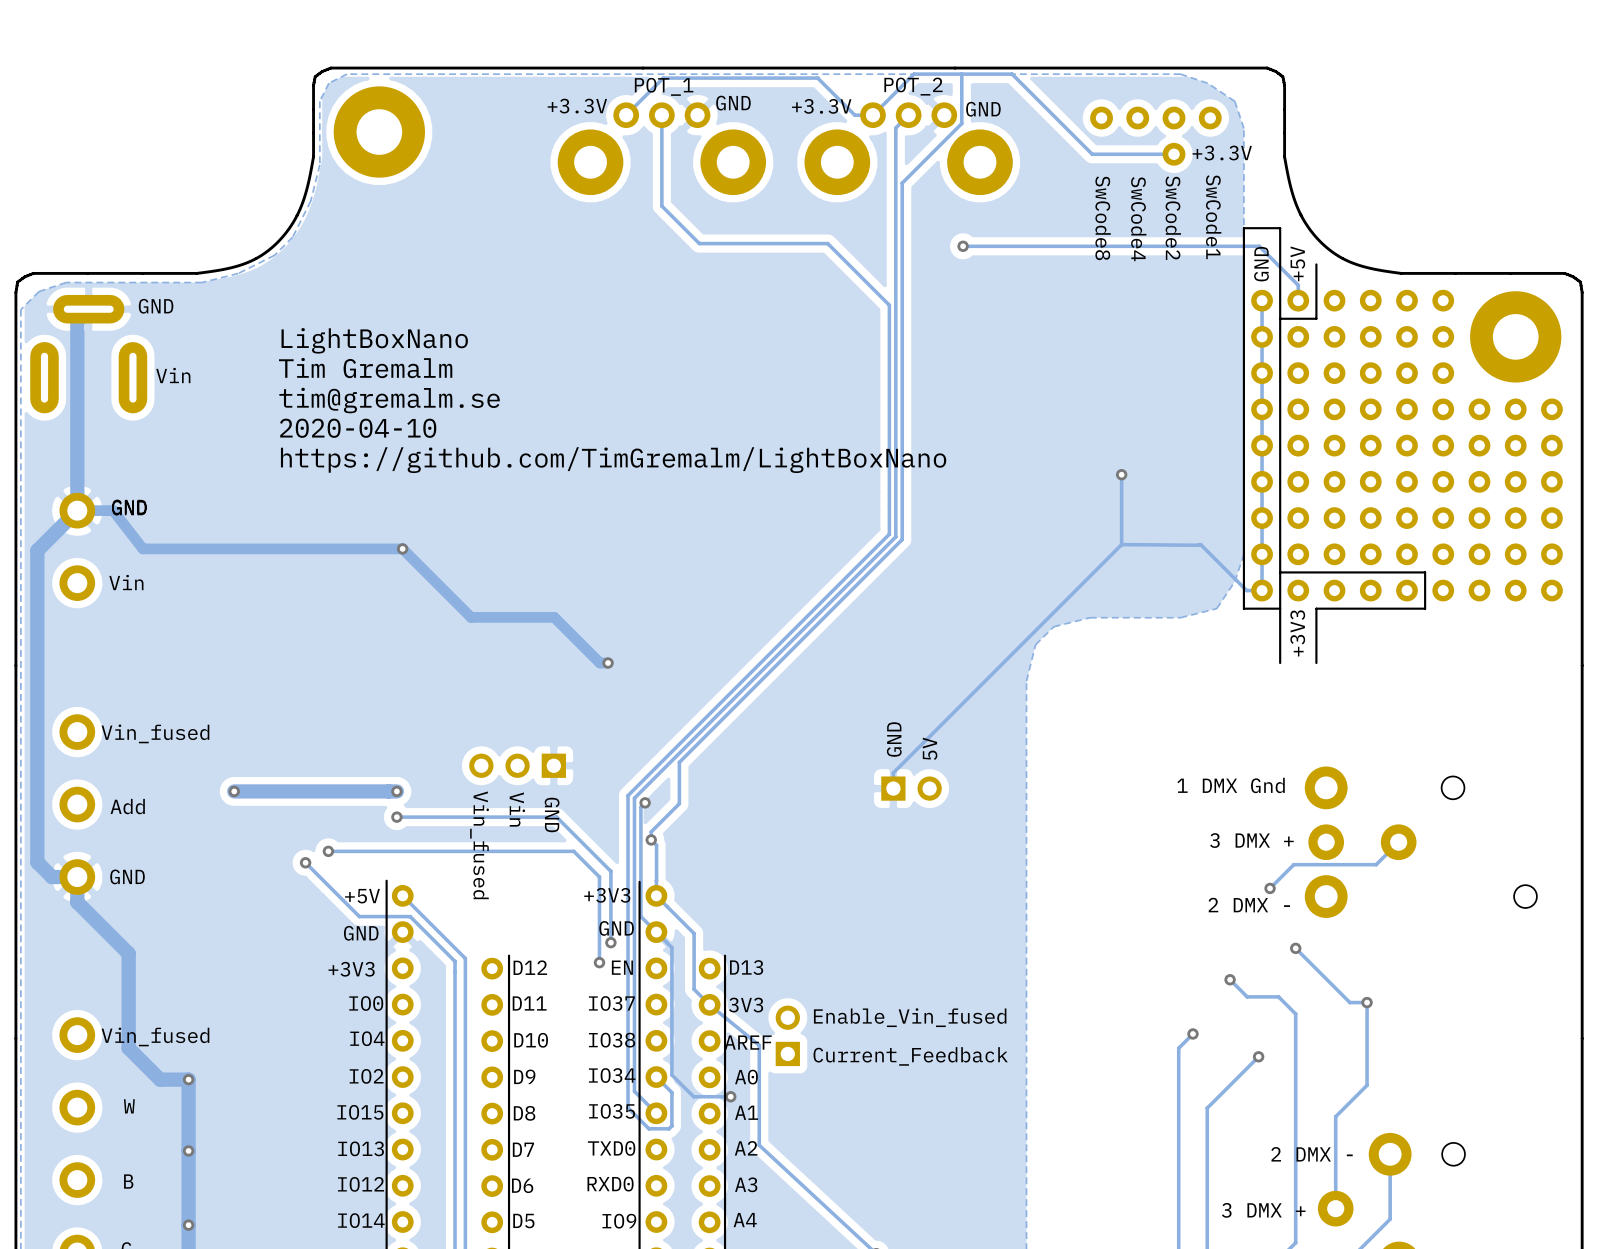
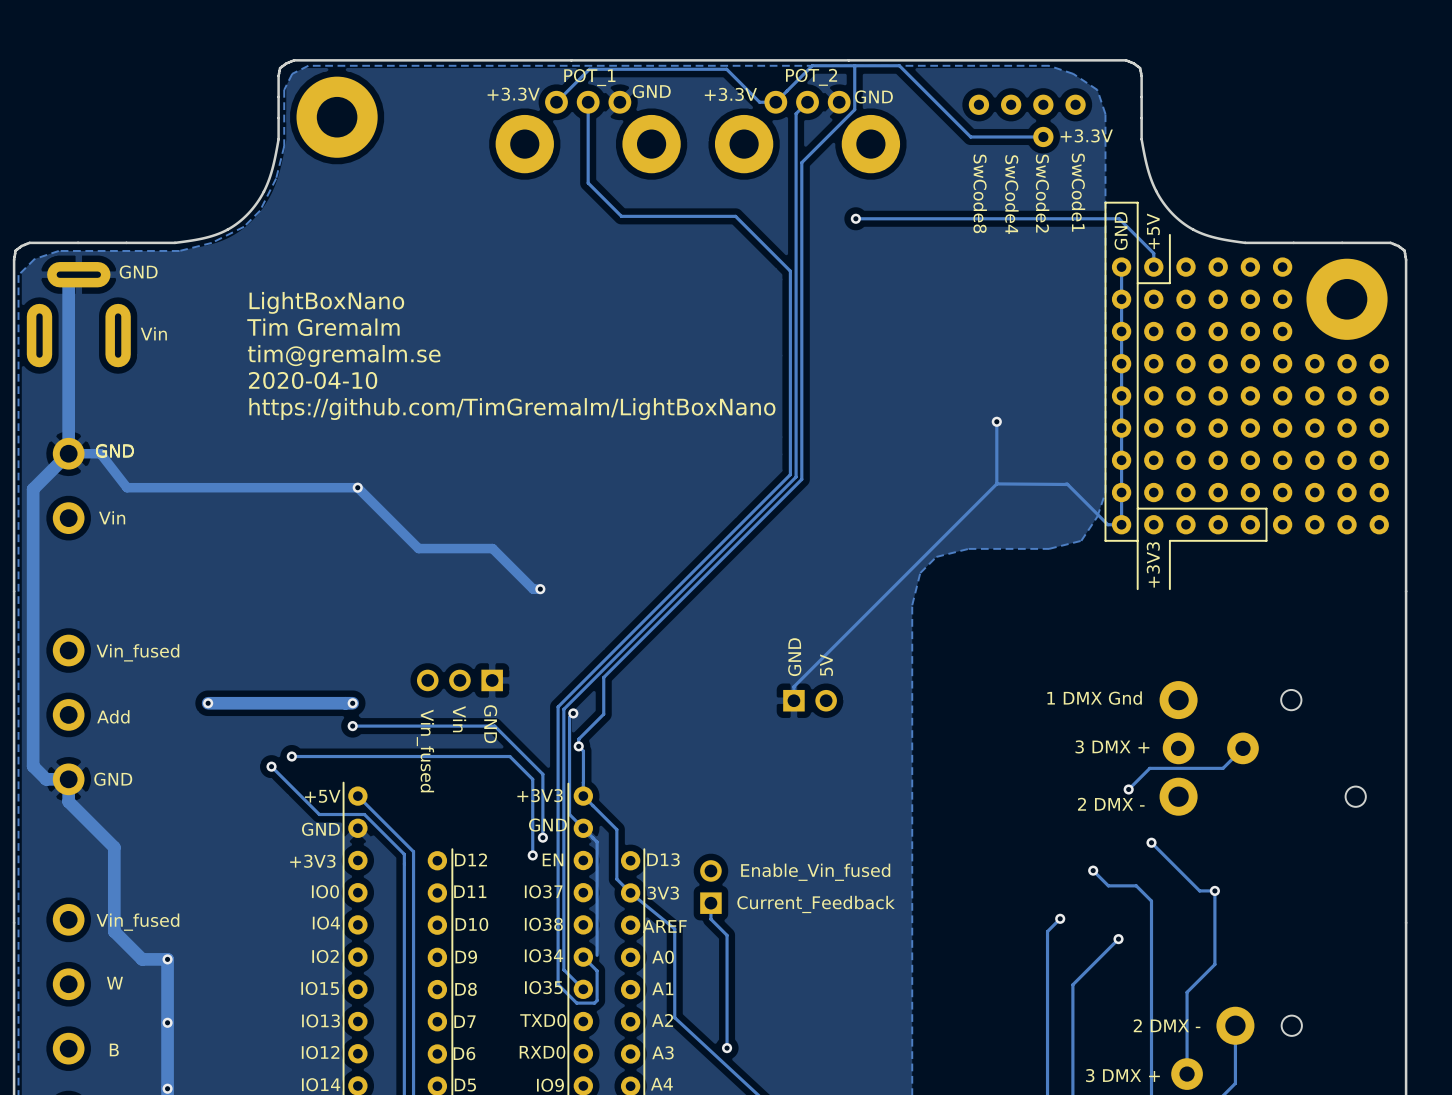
text: none -> Enable_Vin_fused (815, 872)
track: none -> (710, 903) (710, 919) (727, 935) (727, 1048)
text: Enable_Vin_fused (910, 1017) -> Current_Feedback (816, 904)
part position: (787, 1035) -> (710, 887)
text: Current_Feedback (910, 1056) -> none
track: (671, 1075) (693, 1096) (730, 1096) -> none
via: (730, 1096) -> none
via: none -> (727, 1048)

